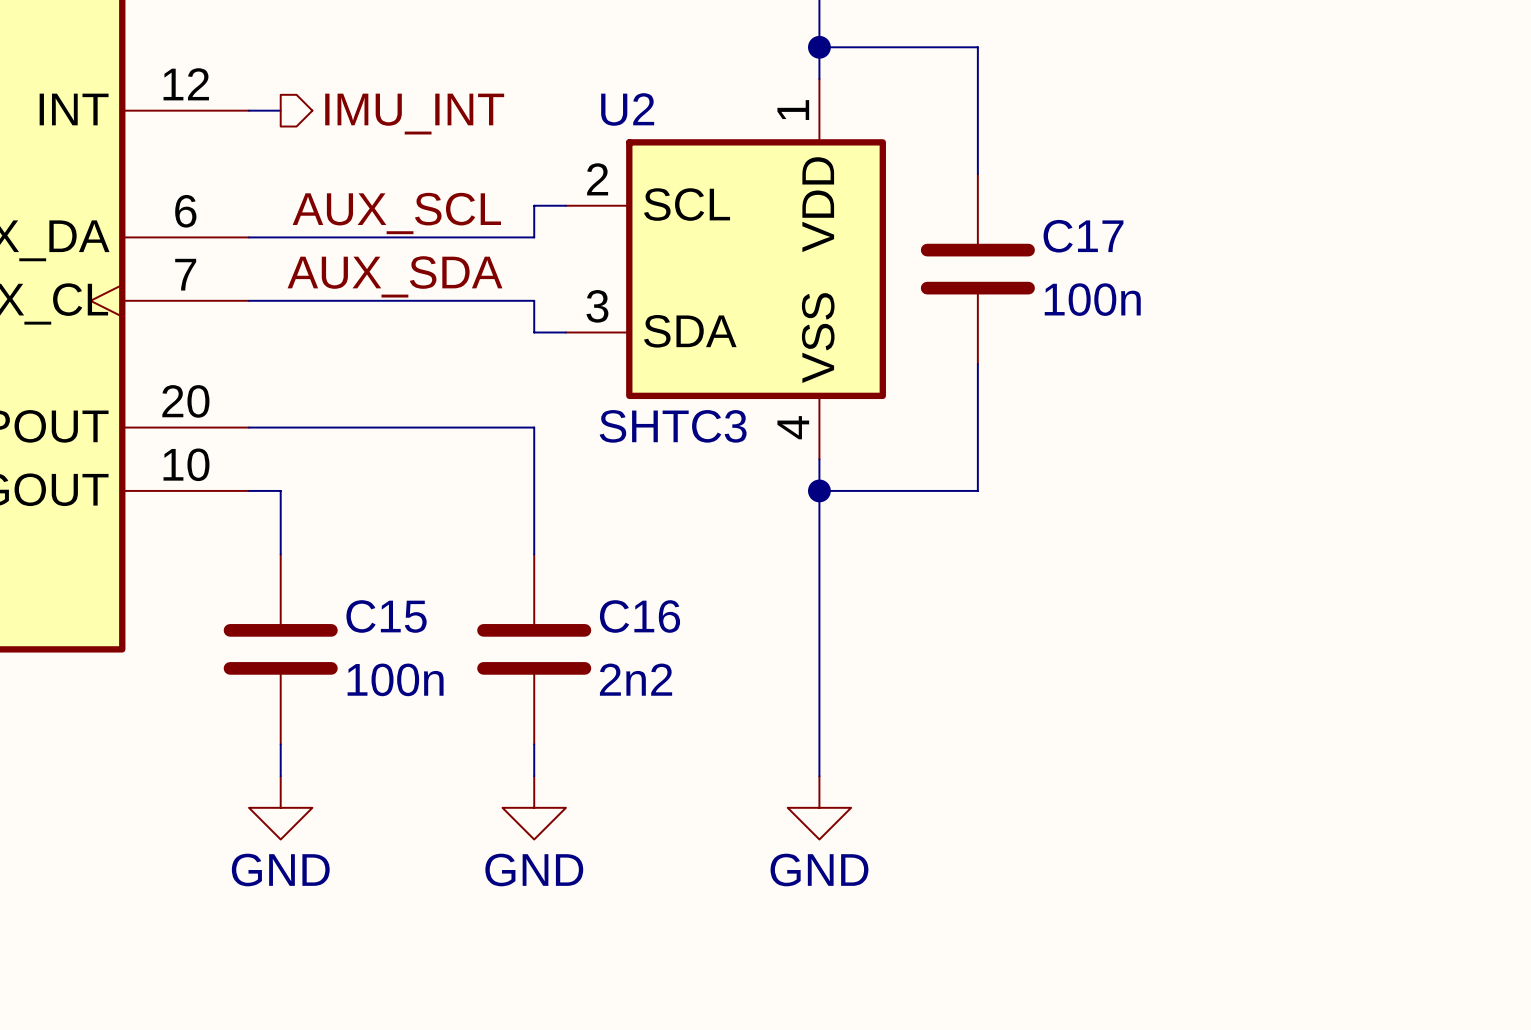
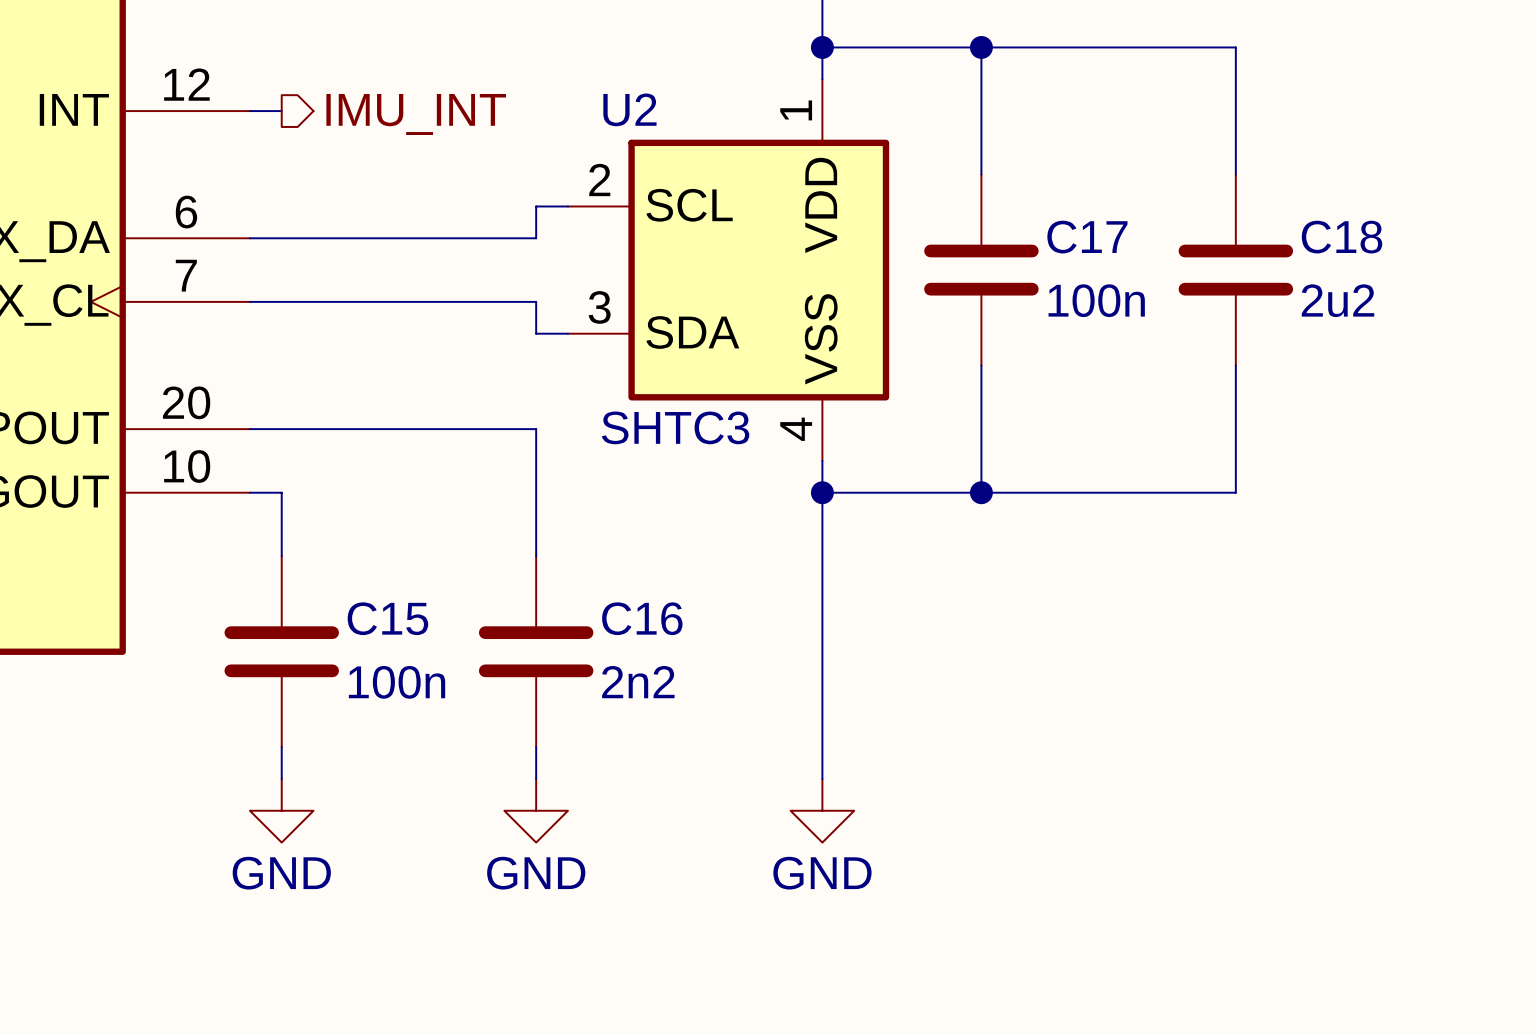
wire: none -> (981, 47) (1235, 47) (1235, 174)
junction: none -> (981, 47)
label: AUX_SCL (396, 213) -> none
C18: none -> 2u2 (1235, 270)
label: AUX_SDA (395, 276) -> none
wire: none -> (1235, 365) (1235, 492) (981, 492)
junction: none -> (981, 492)

